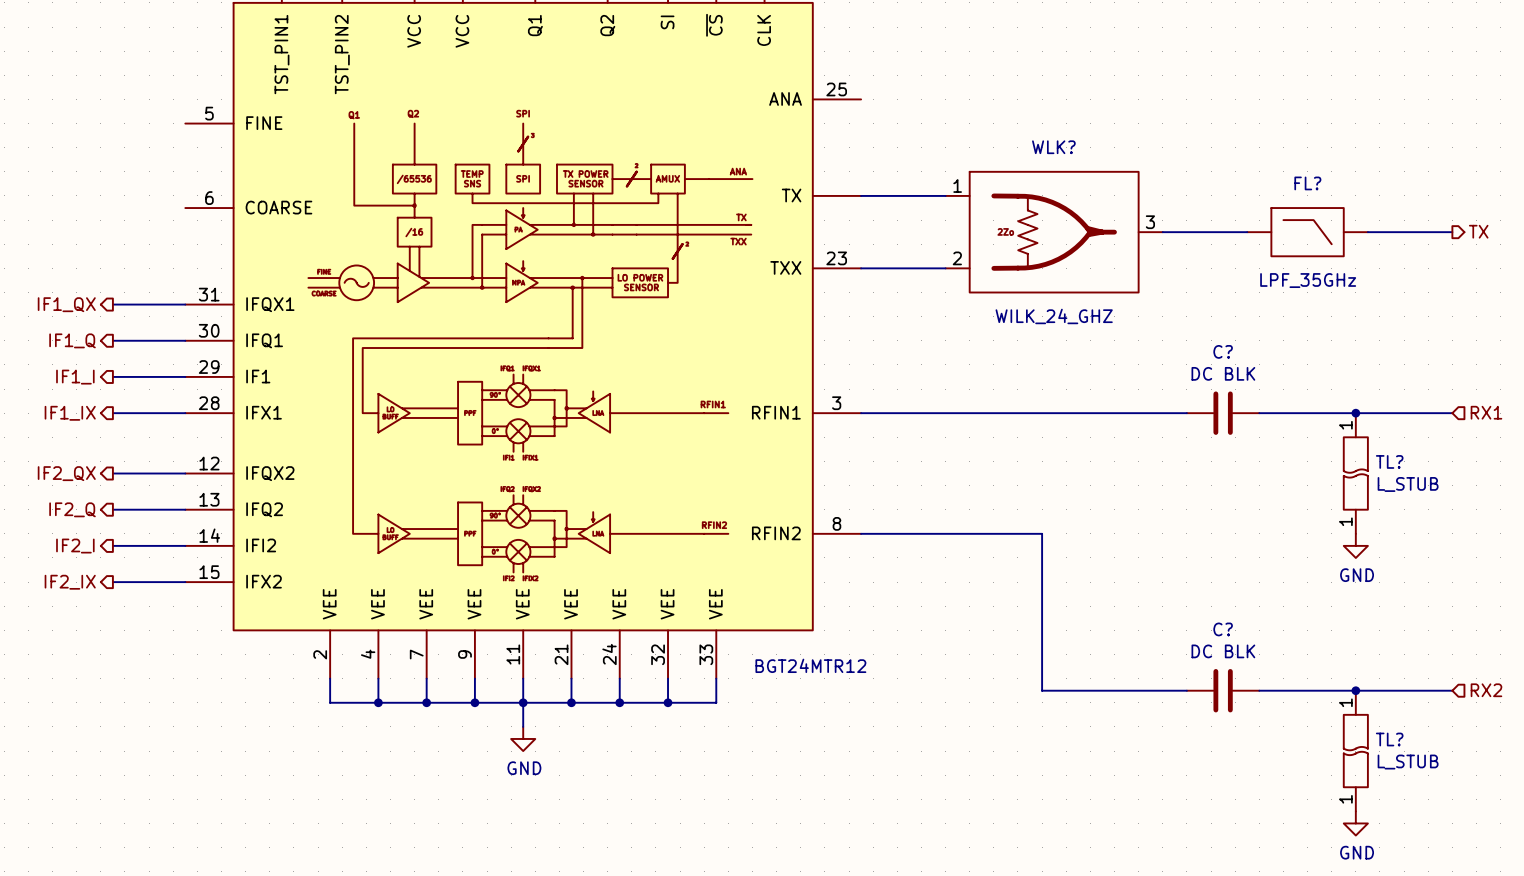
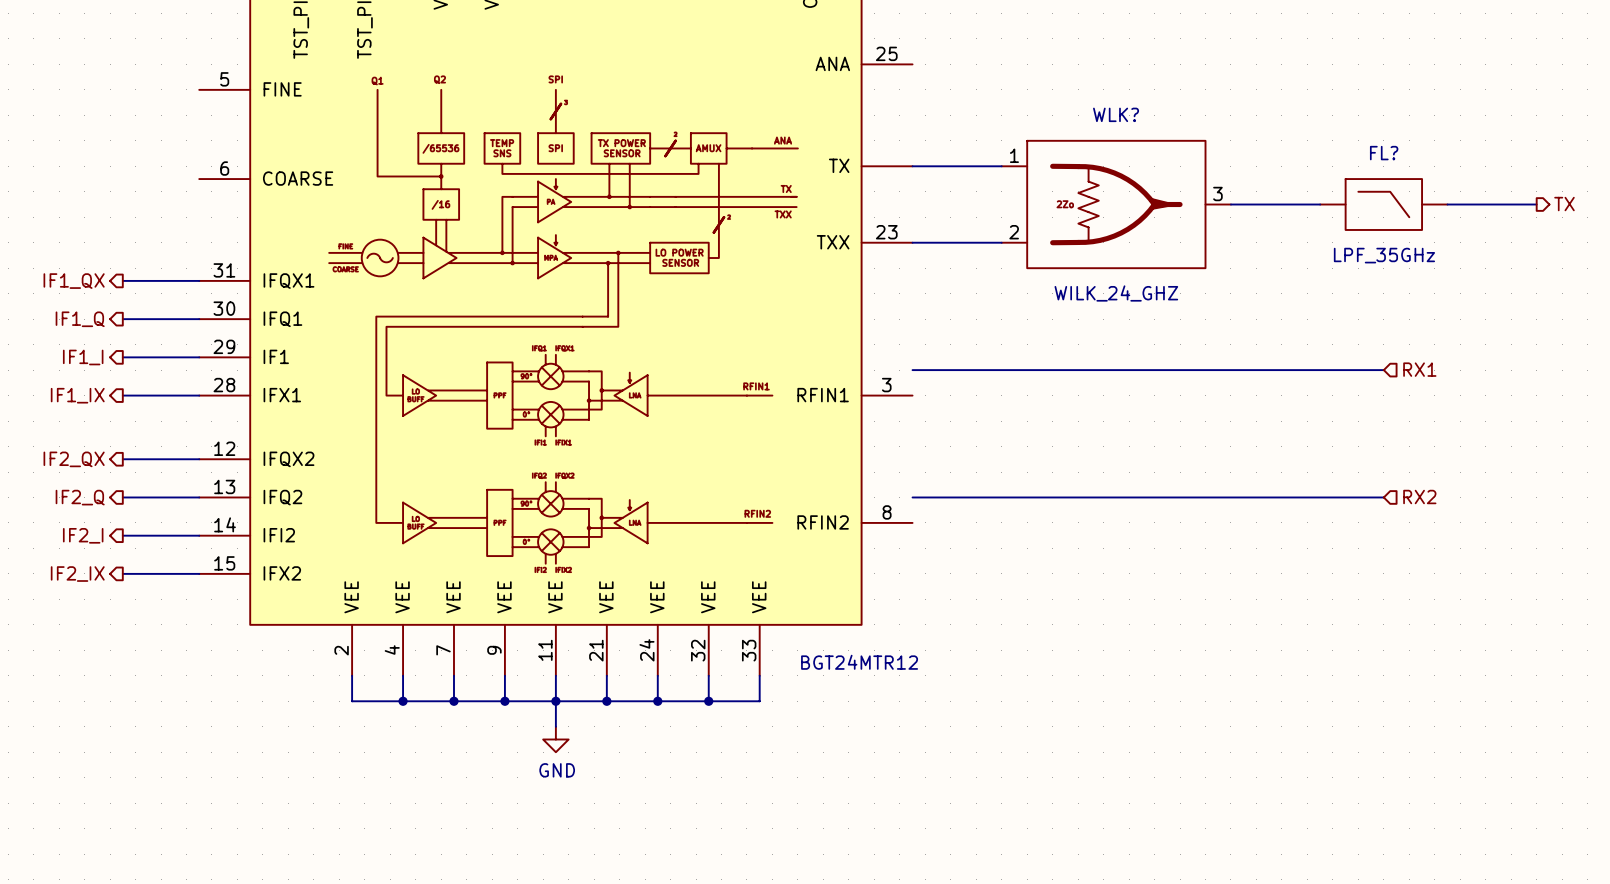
wire: none -> (912, 370) (1383, 370)
hierarchical label position: RX1 (1486, 412) -> RX1 (1419, 369)
wire: (861, 413) (1186, 413) -> none
C?: DC BLK (1223, 413) -> none
wire: (1259, 413) (1452, 413) -> none
junction: (1355, 413) -> none
TL?: L_STUB (1355, 473) -> none
wire: none -> (912, 497) (1383, 497)
wire: (861, 533) (1042, 533) (1042, 690) (1186, 690) -> none
power symbol: GND (1355, 545) -> none
C?: DC BLK (1223, 690) -> none
wire: (1259, 690) (1452, 690) -> none
junction: (1355, 690) -> none
hierarchical label position: RX2 (1486, 690) -> RX2 (1419, 497)
TL?: L_STUB (1355, 751) -> none
power symbol: GND (1355, 823) -> none

